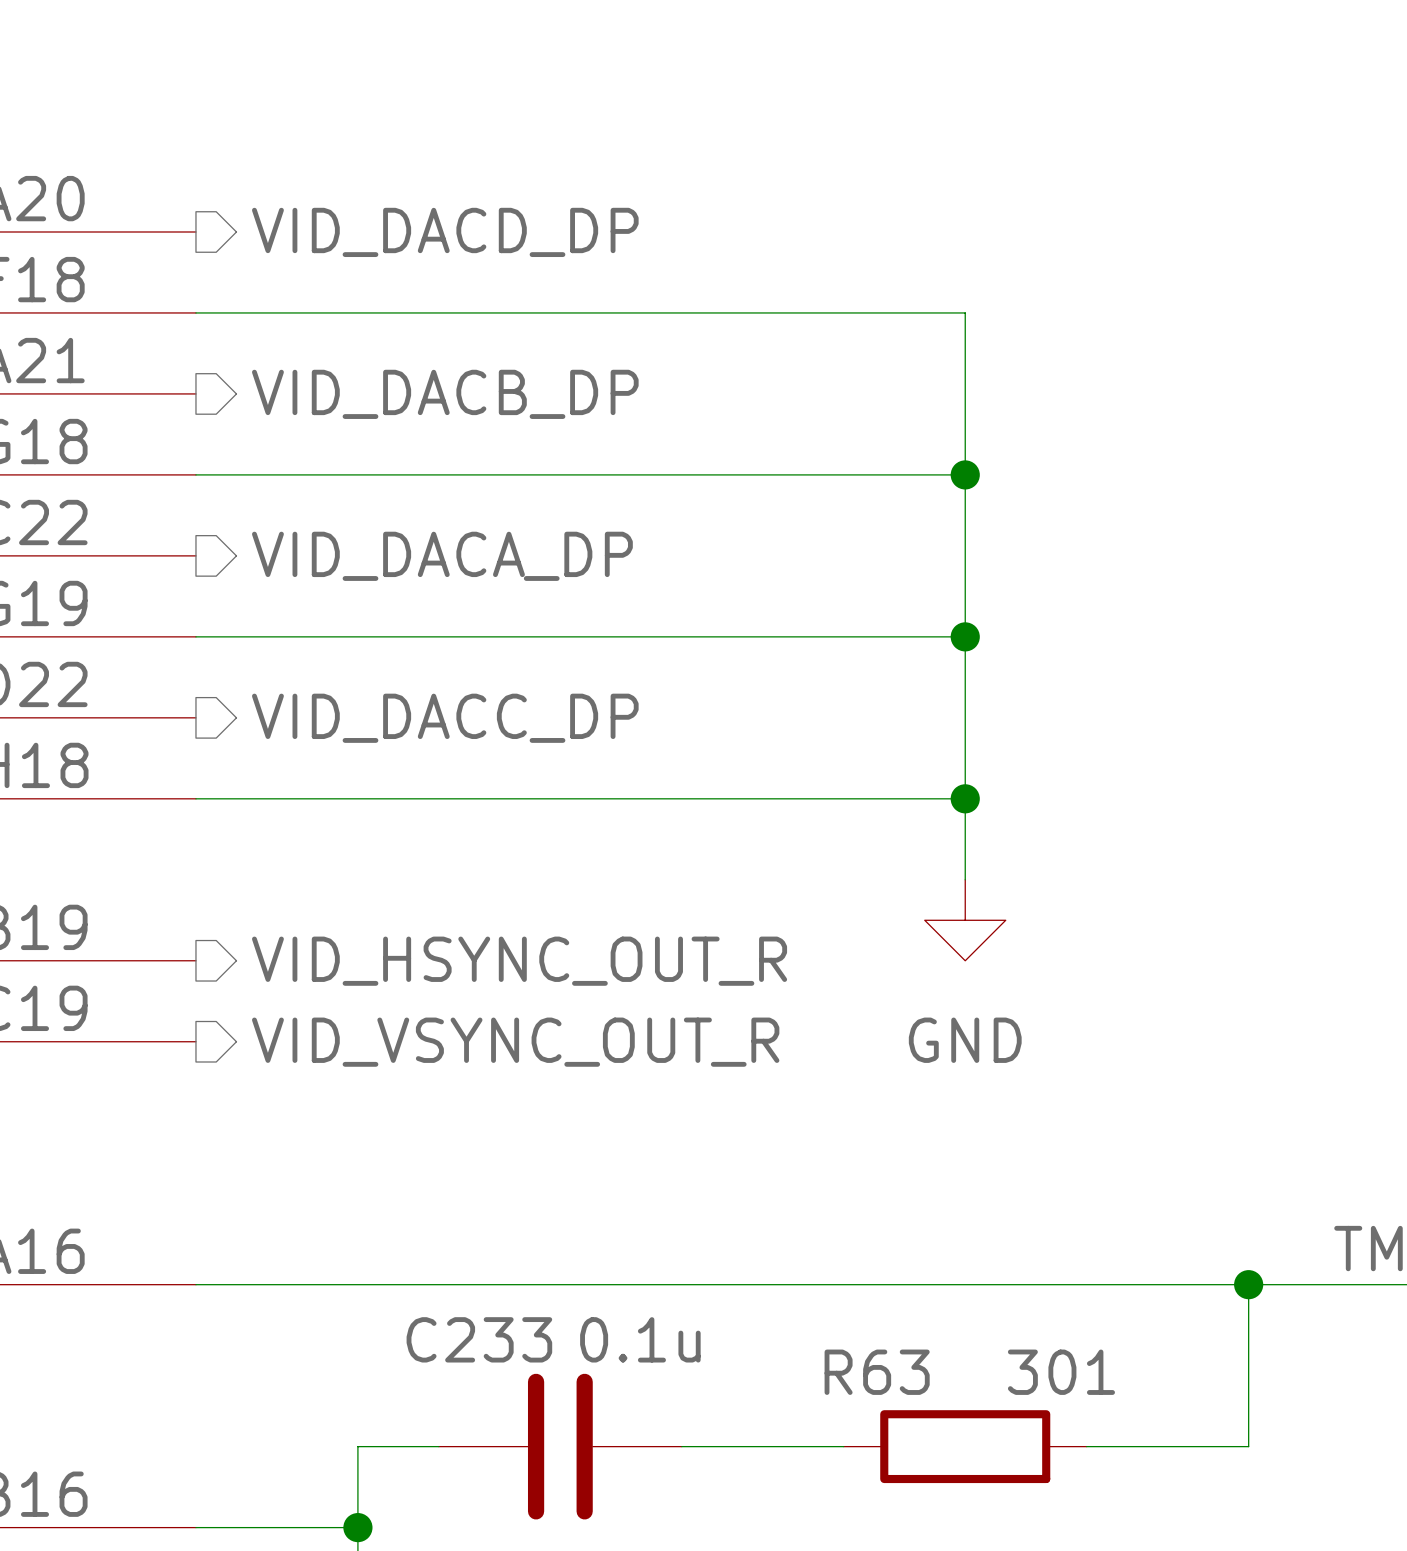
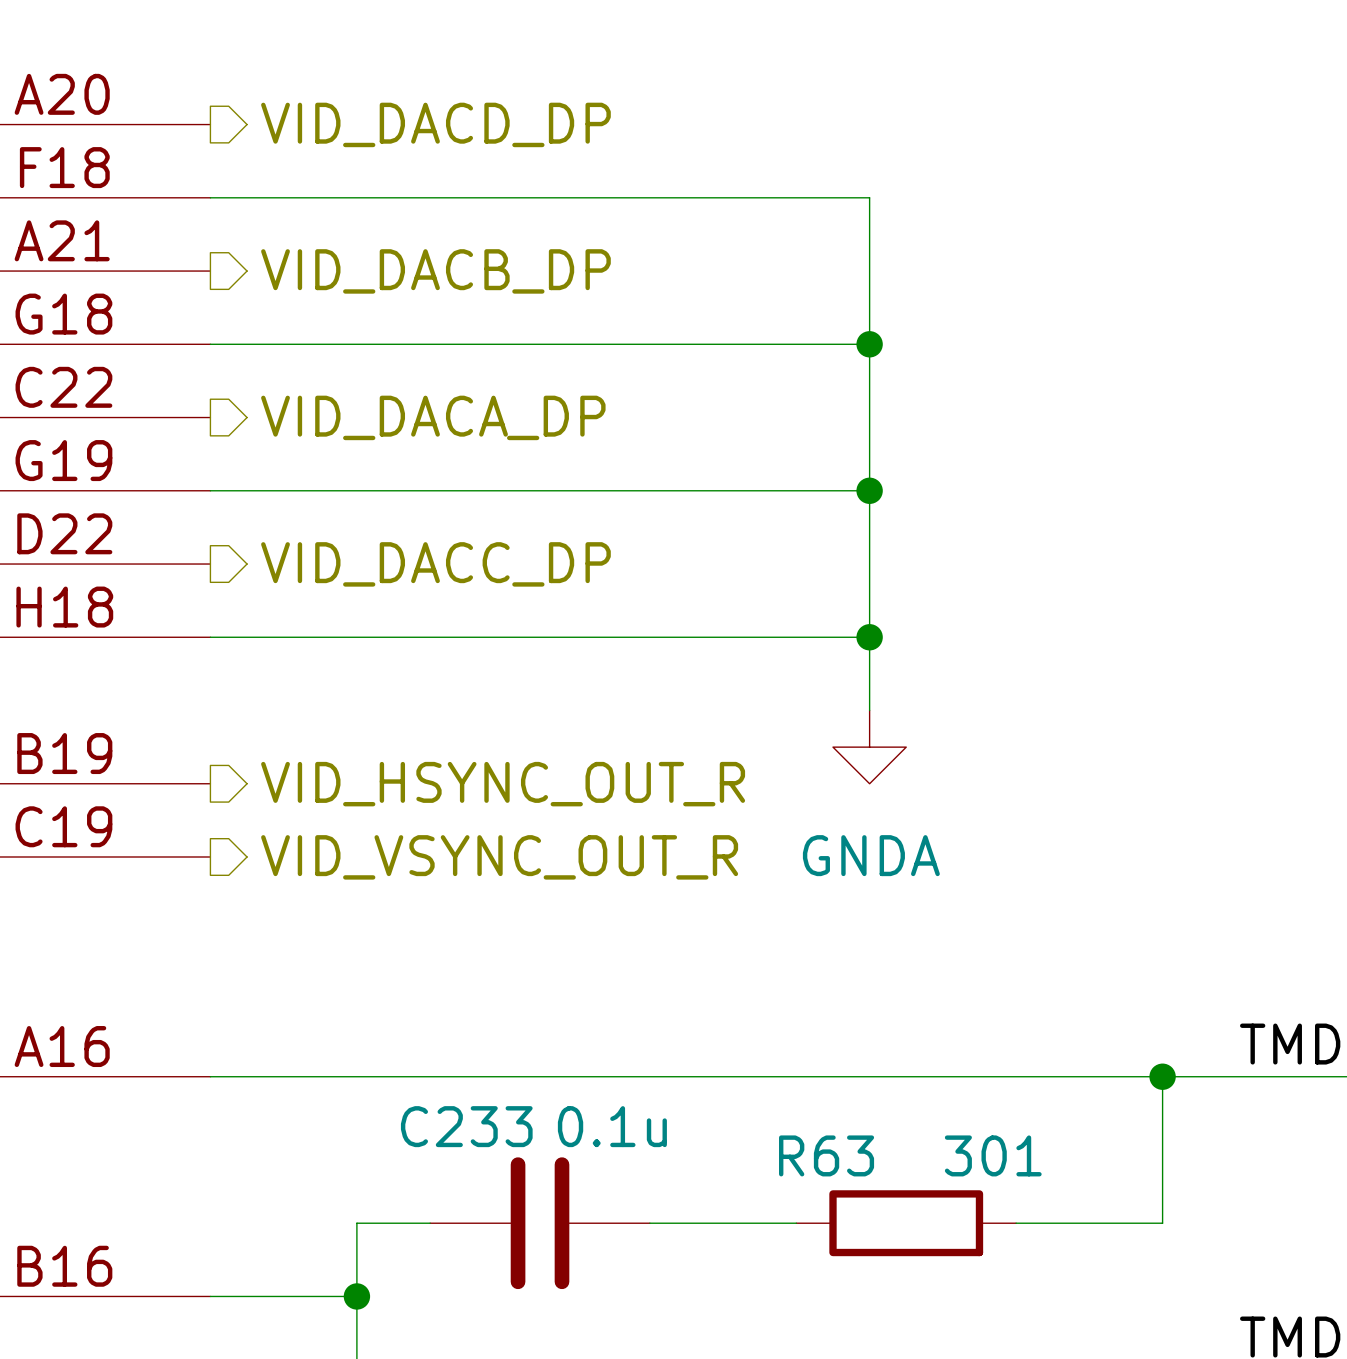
wire: (924, 312) (965, 312) (965, 879) -> (869, 197) (869, 710)
wire: (924, 474) (965, 474) -> none
junction position: (965, 474) -> (869, 344)
wire: (924, 636) (965, 636) -> none
junction position: (965, 636) -> (869, 490)
wire: (924, 798) (965, 798) -> none
junction position: (965, 798) -> (869, 637)
power symbol: none -> GNDA (869, 747)
power symbol: GND (965, 920) -> none

